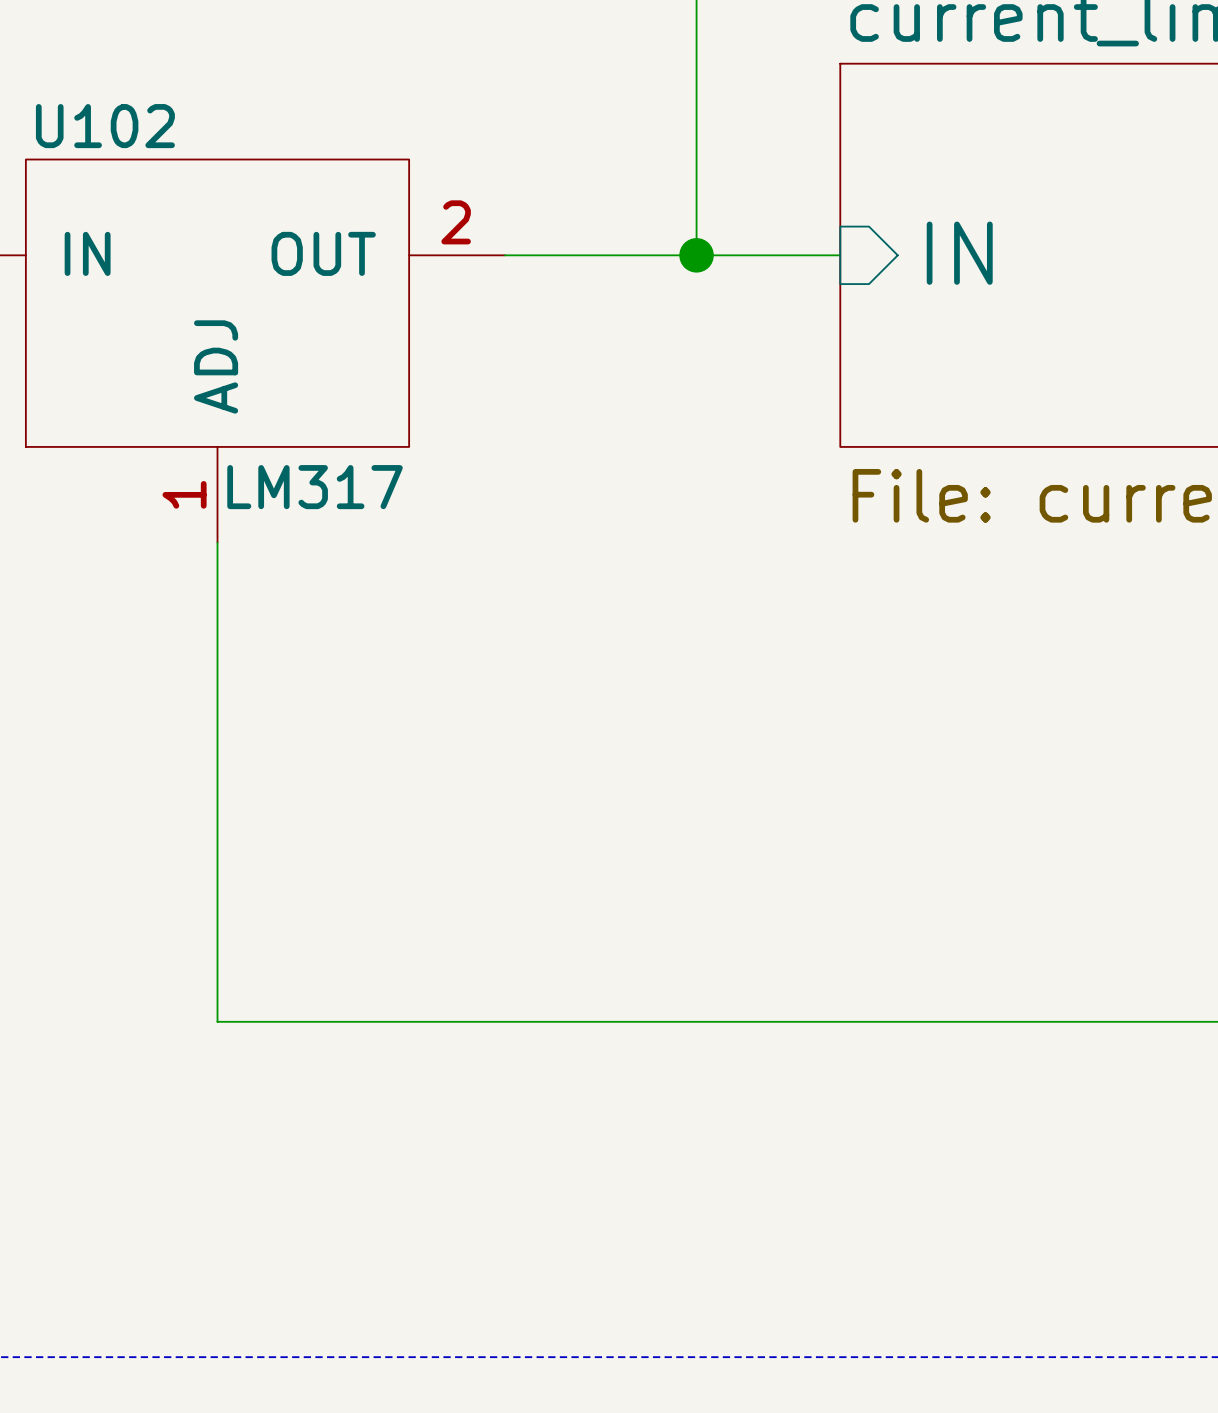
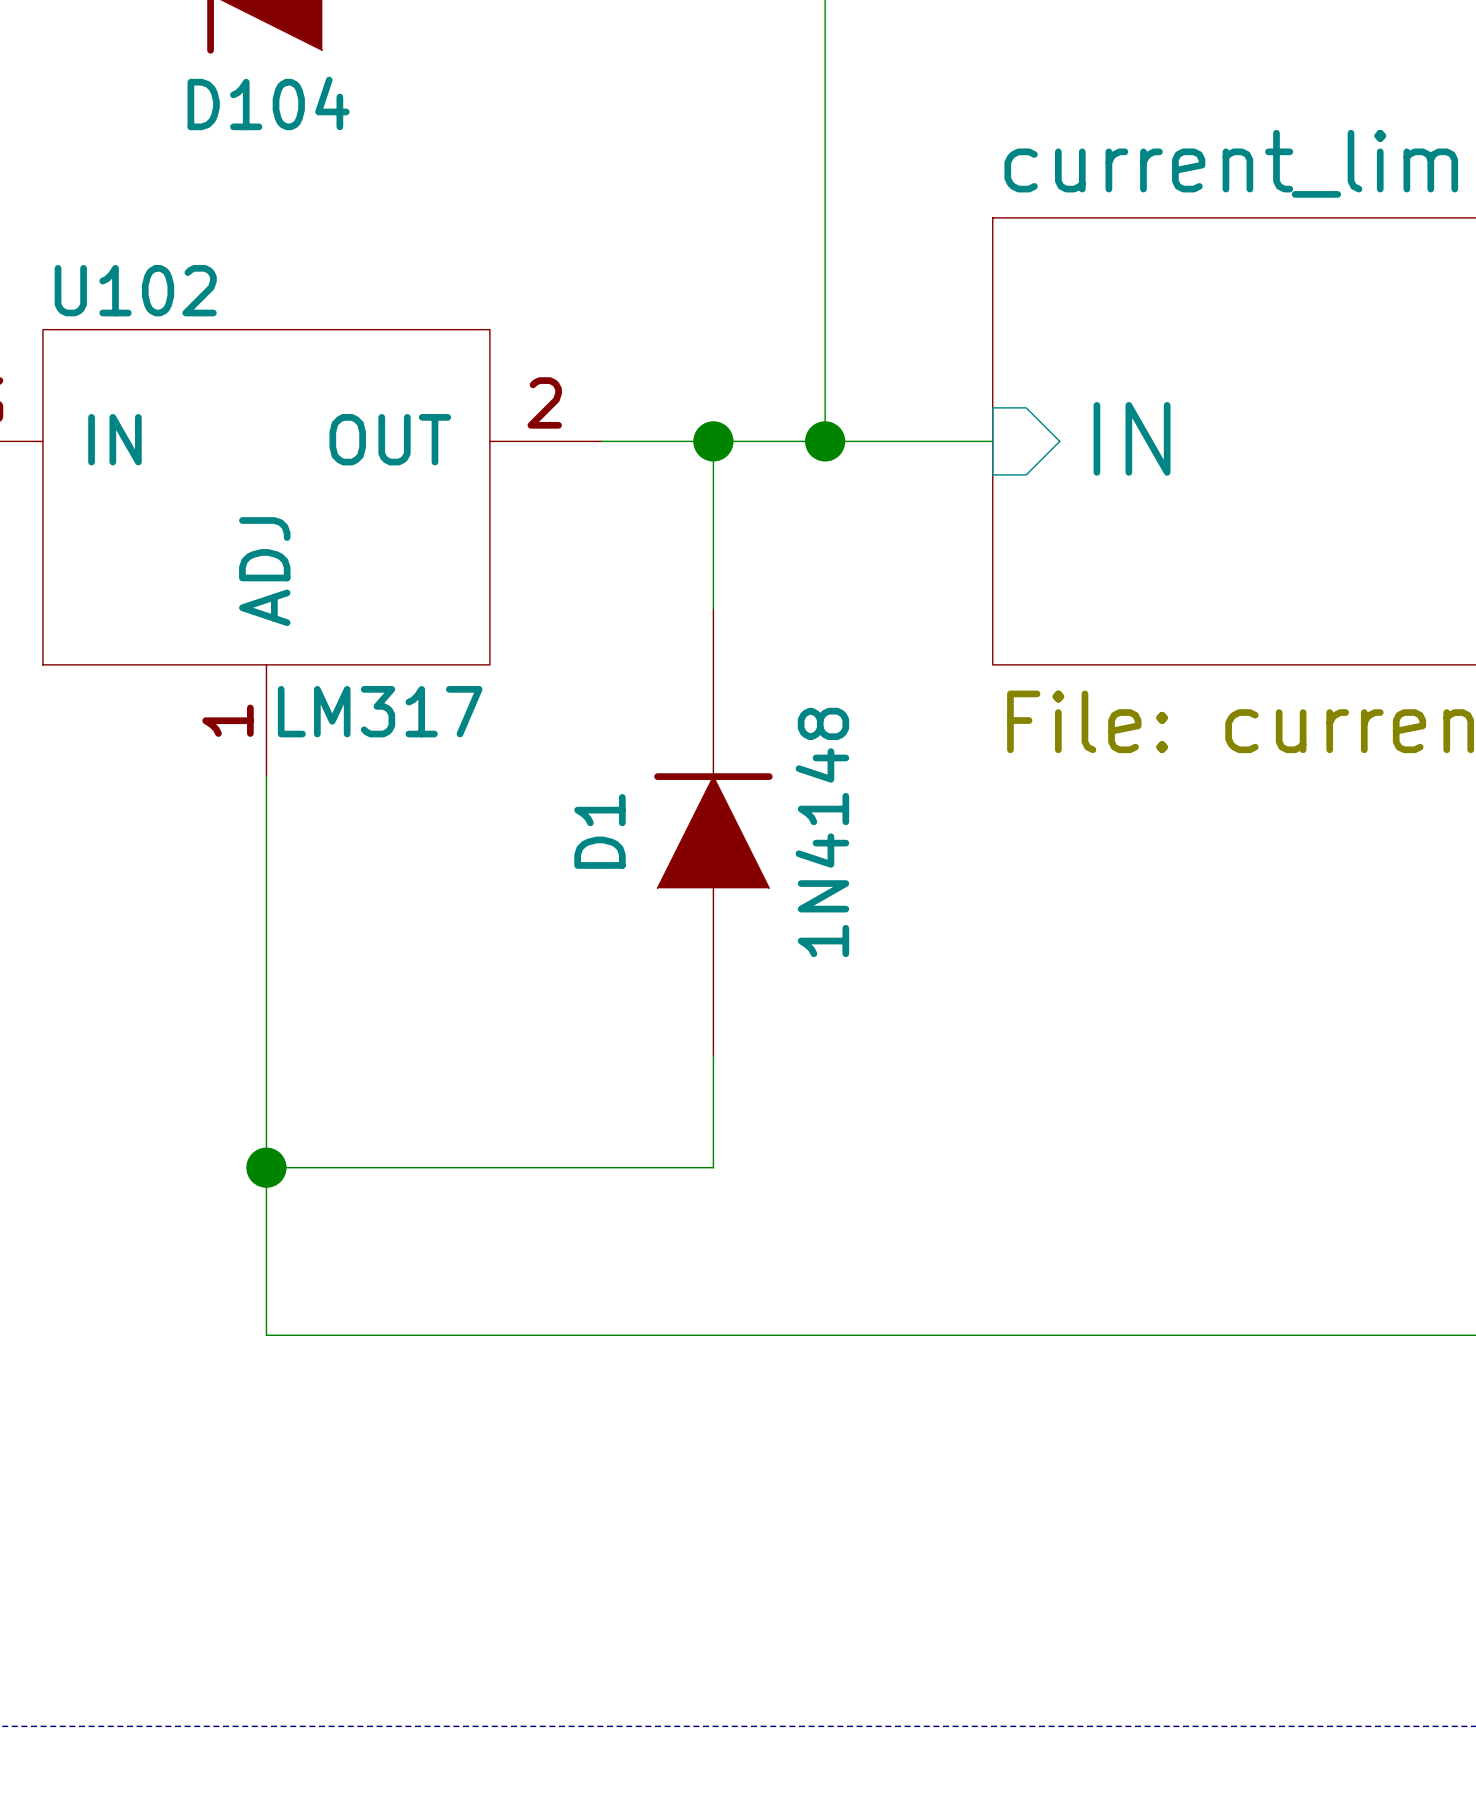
wire: none -> (713, 441) (713, 609)
junction: none -> (713, 441)
D1: none -> 1N4148 (713, 832)
wire: none -> (713, 1055) (713, 1167) (266, 1167)
junction: none -> (266, 1167)

